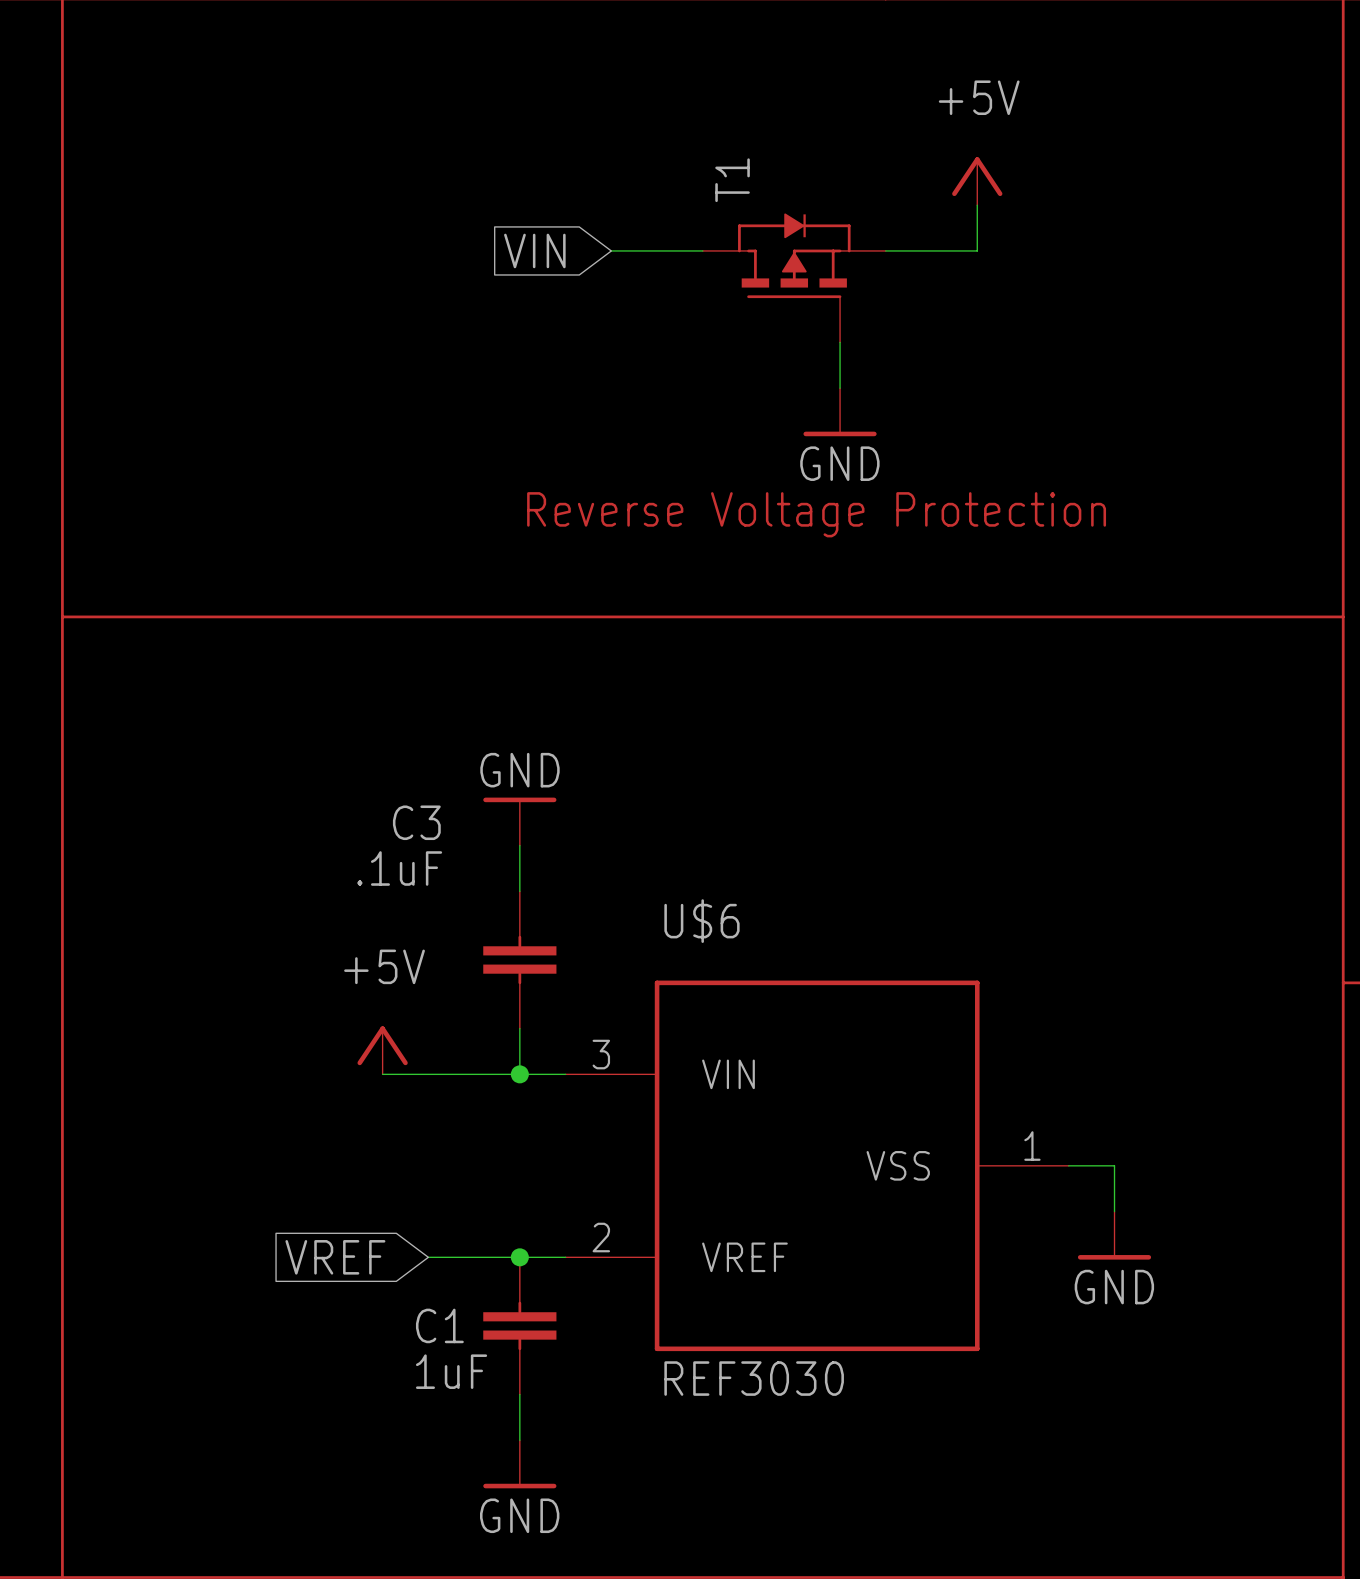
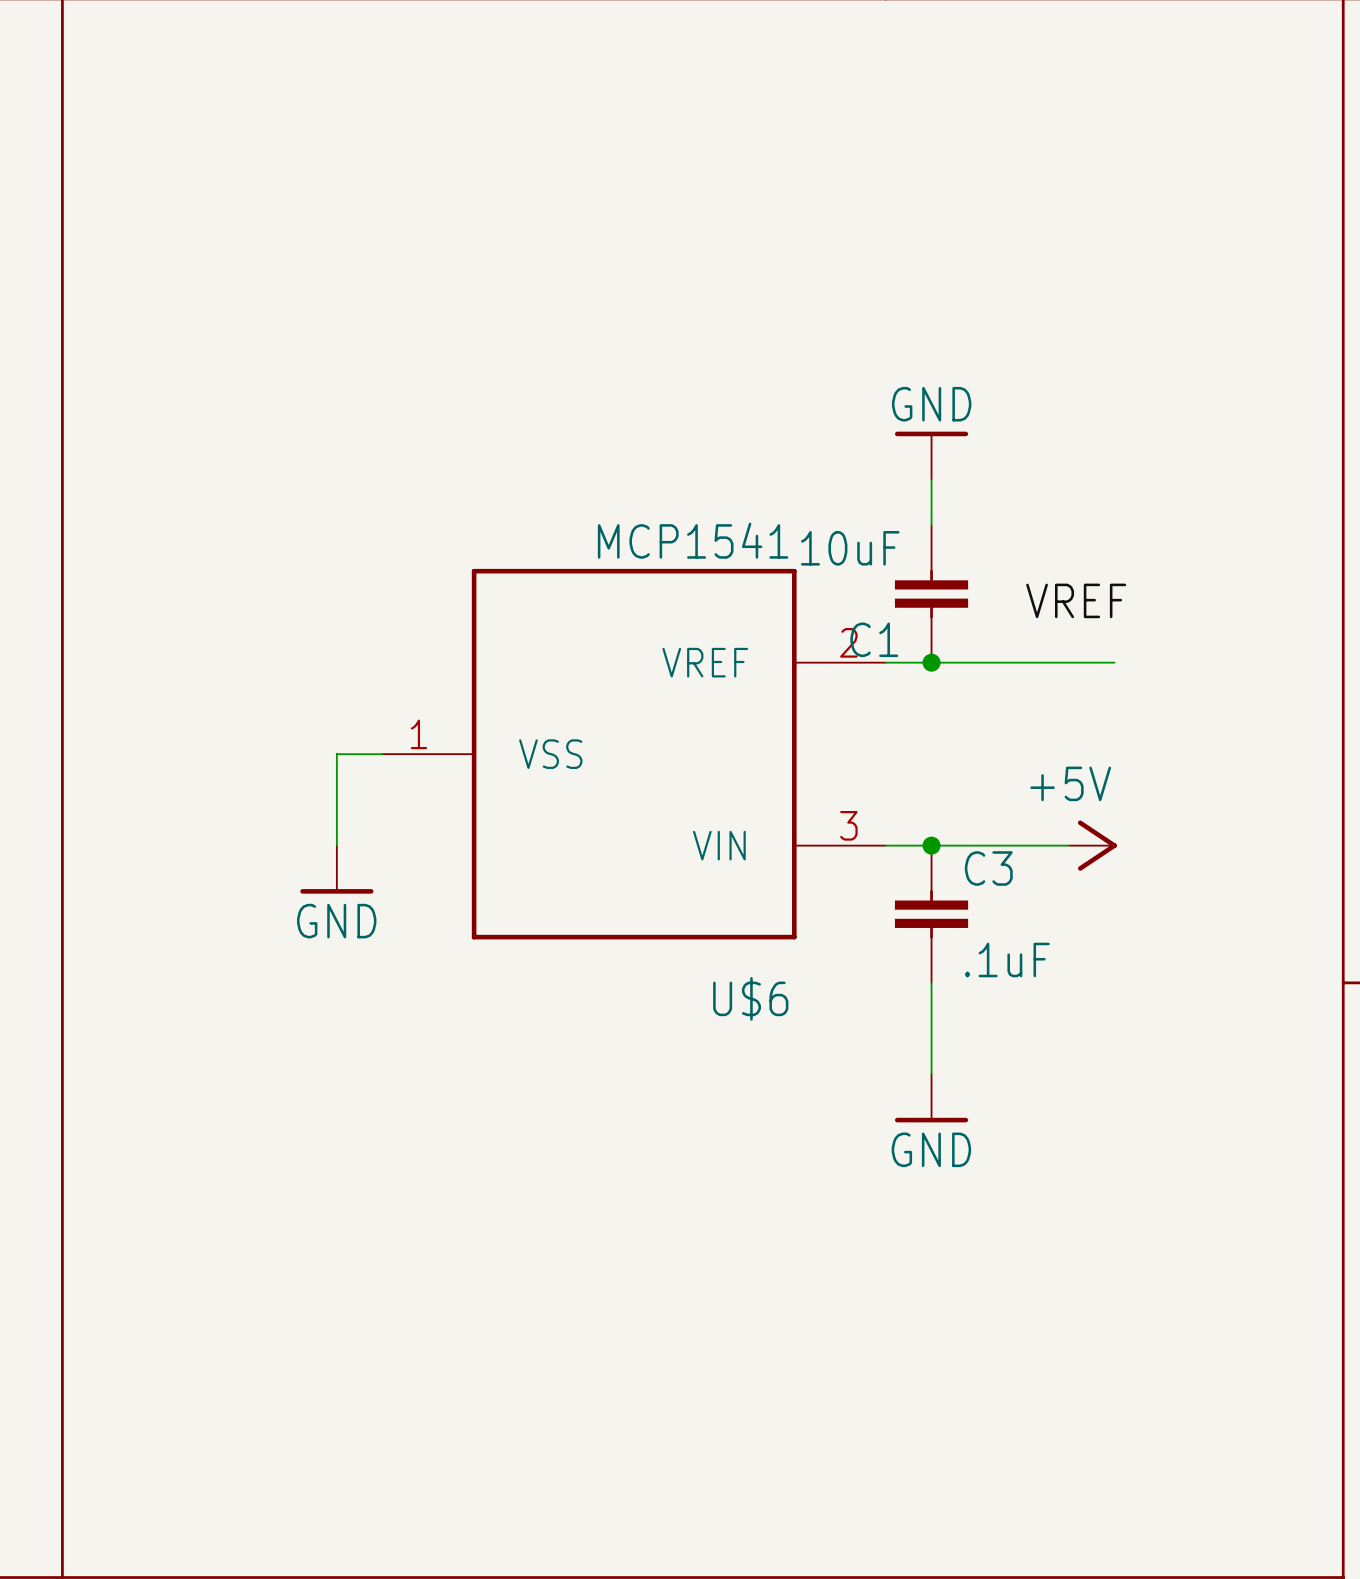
power symbol: +5V (977, 181) -> none
wire: (977, 205) (977, 250) (885, 250) -> none
global label: VIN (534, 250) -> none
wire: (611, 250) (702, 250) -> none
T1: (794, 277) -> none
wire: (840, 342) (840, 388) -> (931, 479) (931, 525)
power symbol position: GND (840, 412) -> GND (931, 455)
power symbol rotation: 0° (840, 433) -> 180° (931, 433)
text: Reverse Voltage Protection (816, 514) -> none
label: none -> VREF (1076, 600)
line: (62, 616) (1343, 616) -> none
wire: none -> (885, 662) (1114, 662)
junction: none -> (931, 662)
wire: none -> (382, 754) (336, 754) (336, 845)
power symbol rotation: 0° (519, 799) -> 180° (336, 891)
power symbol position: GND (519, 821) -> GND (336, 869)
C3 name position: C3 (416, 822) -> C3 (988, 868)
wire: (519, 845) (519, 891) -> none
wire: none -> (885, 845) (1068, 845)
junction: none -> (931, 845)
power symbol: none -> +5V (1092, 845)
C3 value position: .1uF (399, 868) -> .1uF (1007, 959)
C3 position: (519, 959) -> (931, 914)
wire: none -> (931, 982) (931, 1074)
wire: (519, 1028) (519, 1074) -> none
power symbol: +5V (382, 1050) -> none
wire: (382, 1074) (565, 1074) -> none
junction: (519, 1074) -> none
U$6 rotation: 0° (817, 1165) -> 180° (634, 754)
U$6 position: (817, 1165) -> (634, 754)
wire: (1068, 1165) (1114, 1165) (1114, 1211) -> none
power symbol position: GND (1114, 1235) -> GND (931, 1098)
global label: VREF (335, 1257) -> none
wire: (428, 1257) (565, 1257) -> none
junction: (519, 1257) -> none
C1 name position: C1 (439, 1325) -> C1 (874, 639)
C1 position: (519, 1325) -> (931, 594)
C1 value: 1uF (451, 1371) -> 10uF (850, 548)
U$6 value: REF3030 (754, 1378) -> MCP1541 (693, 540)
wire: (519, 1394) (519, 1440) -> none
power symbol: GND (519, 1464) -> none

